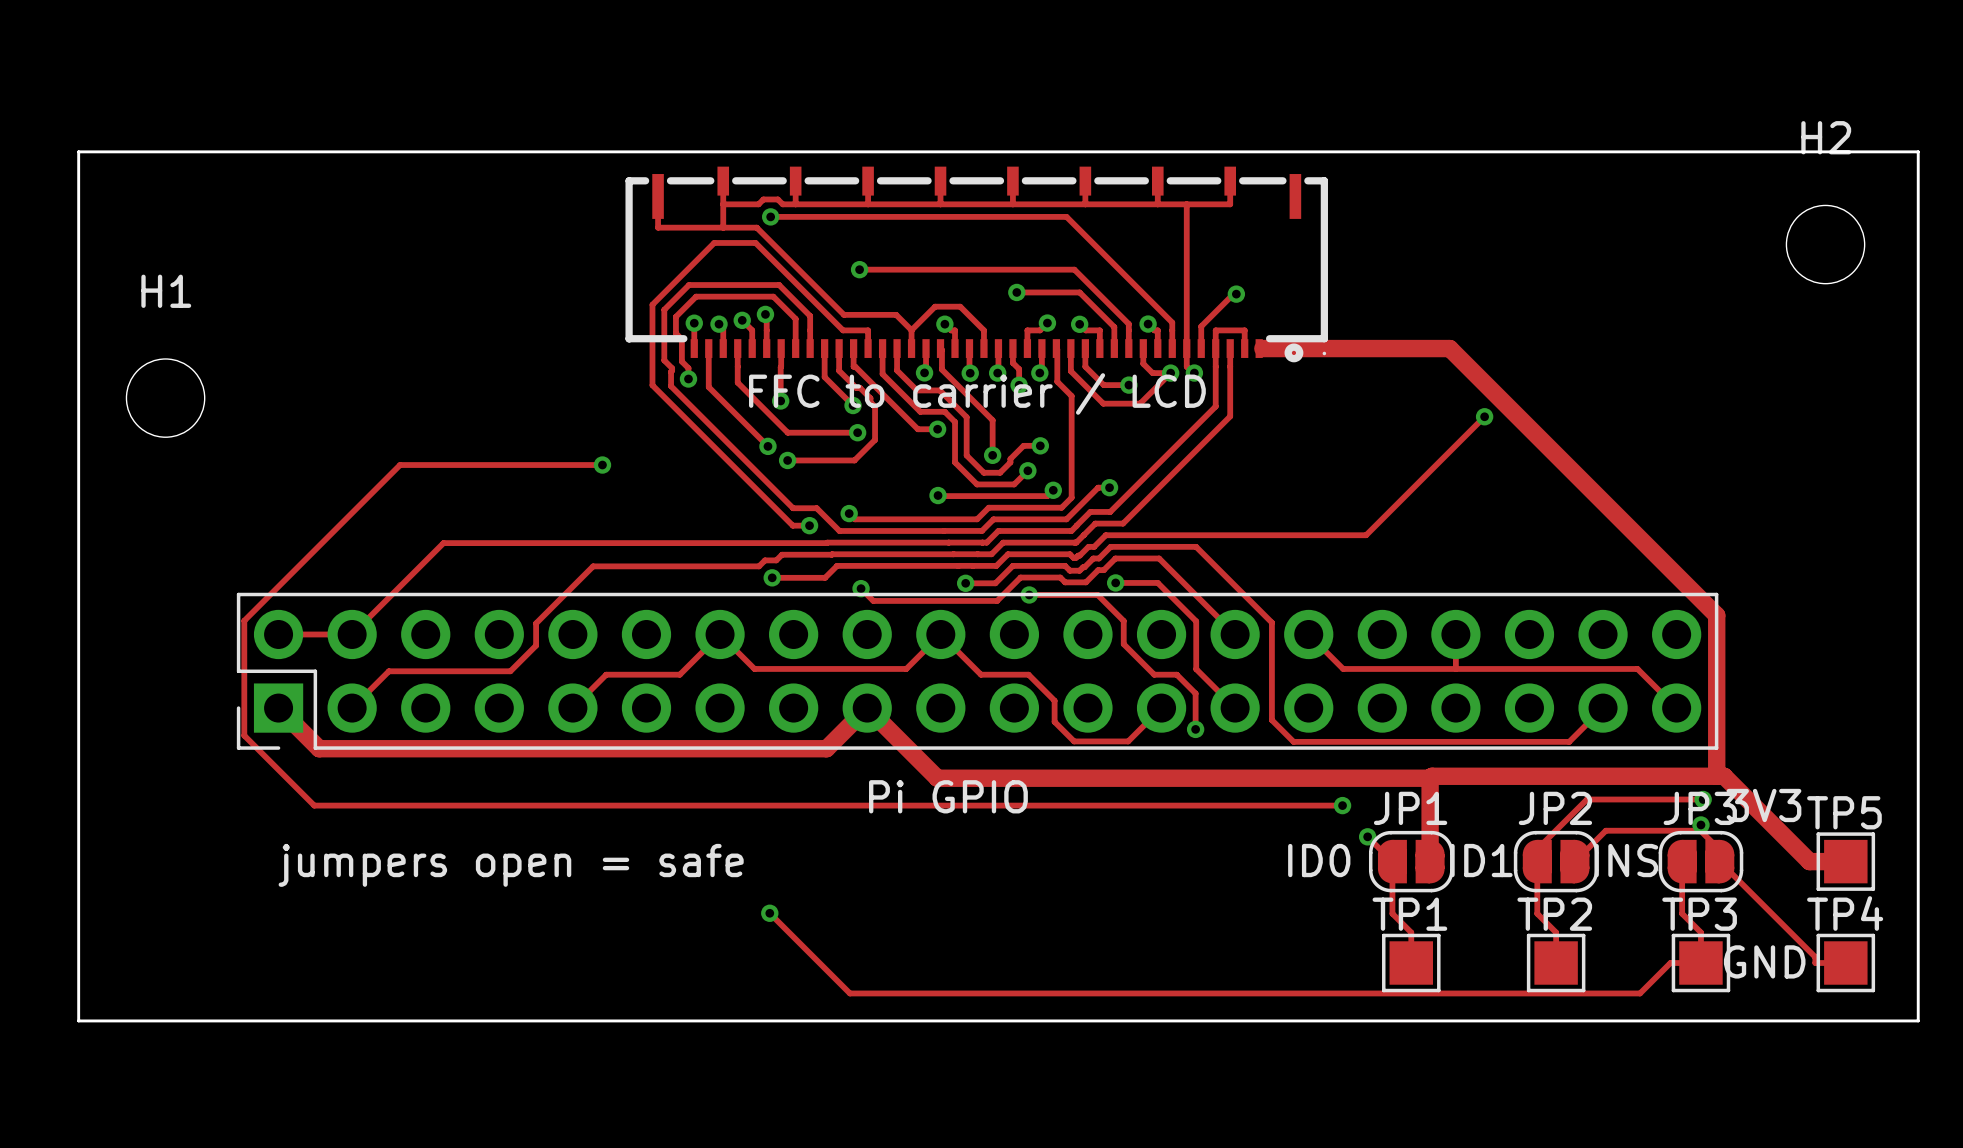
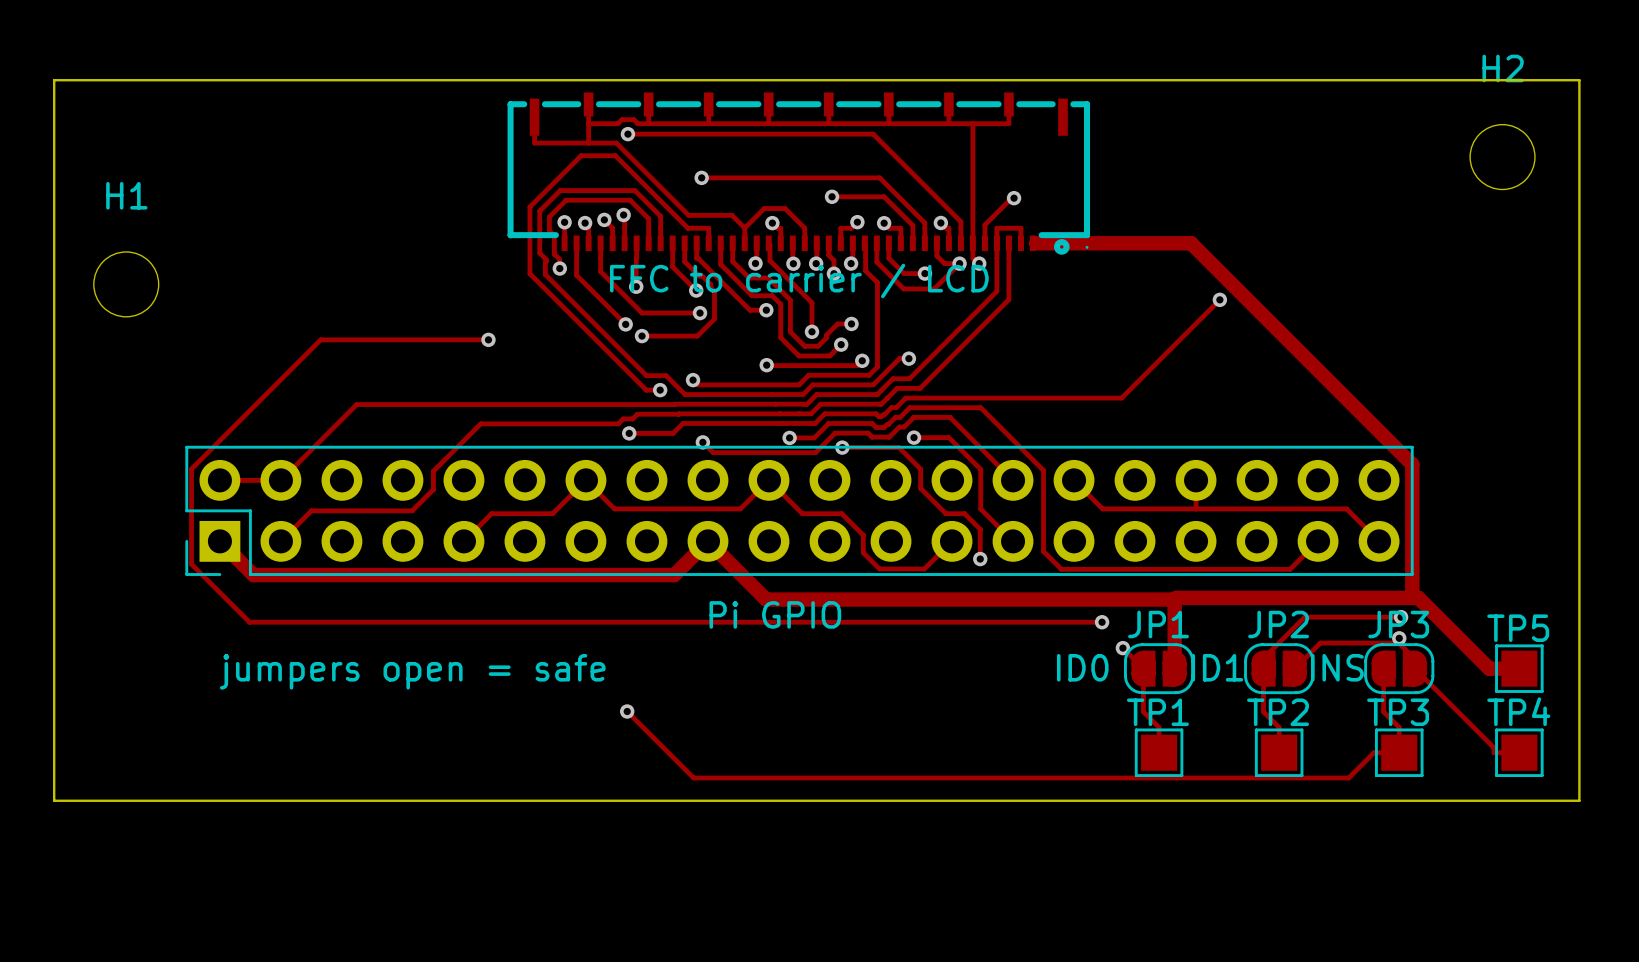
text: 3V3 (1764, 805) -> none
text: GND (1764, 961) -> none

